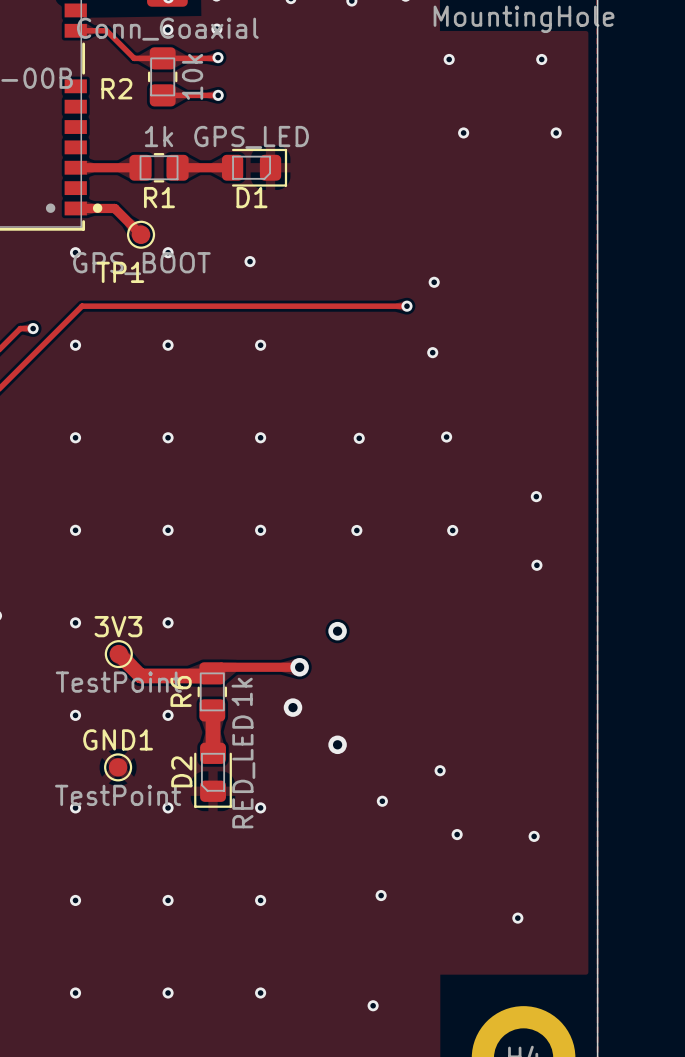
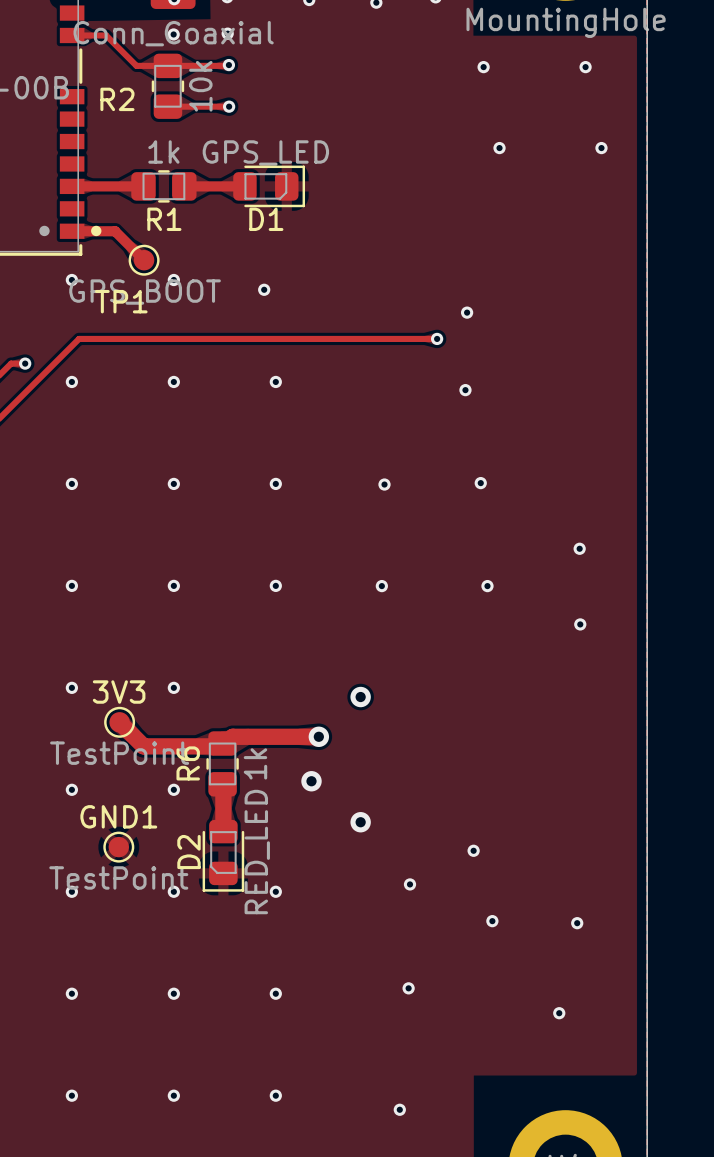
track width: thin (299, 667) (221, 667) (212, 675) -> thick (318, 736) (232, 736) (223, 746)

